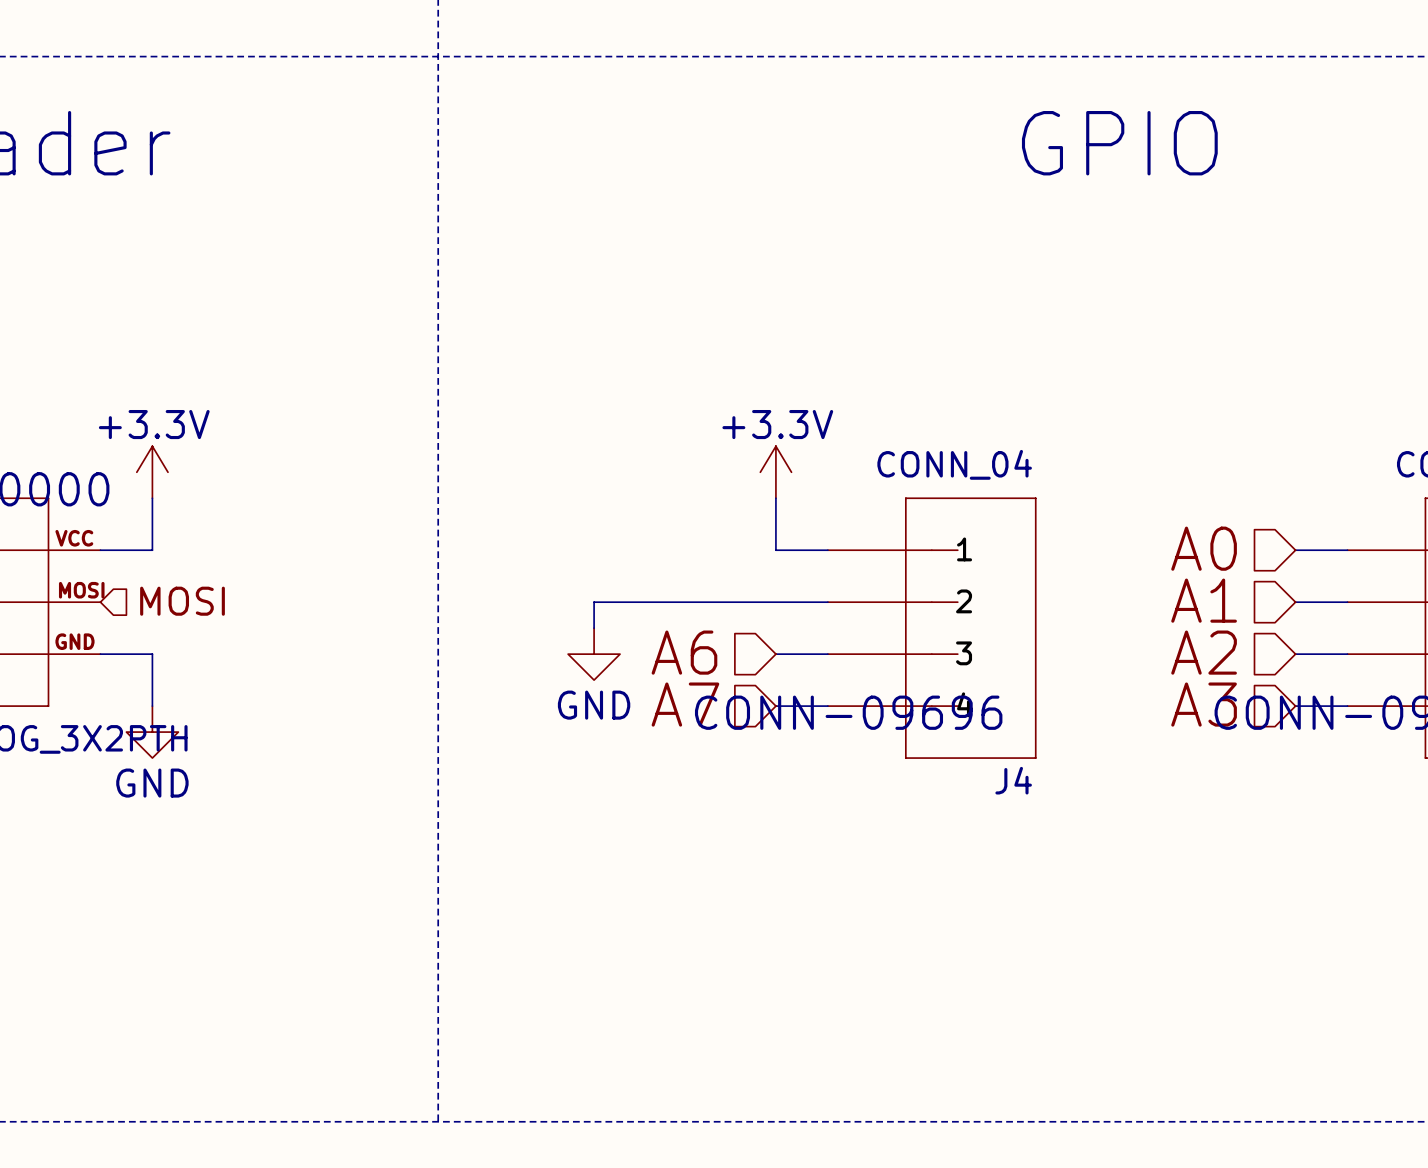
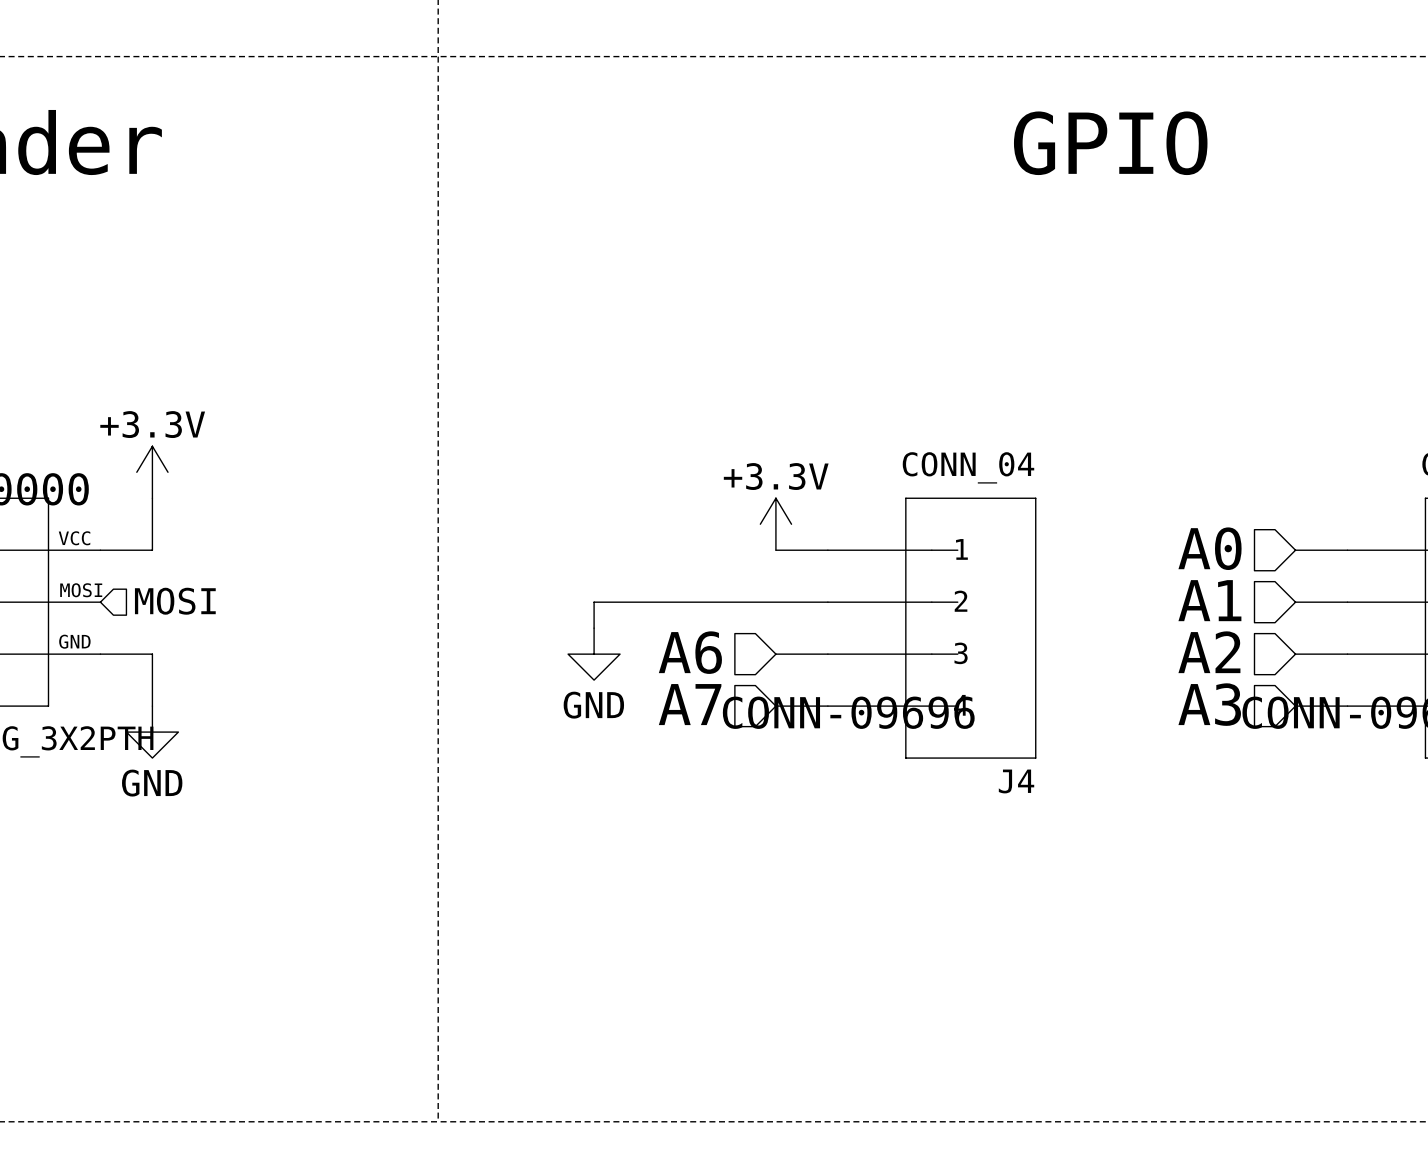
power symbol position: +3.3V (775, 472) -> +3.3V (775, 524)

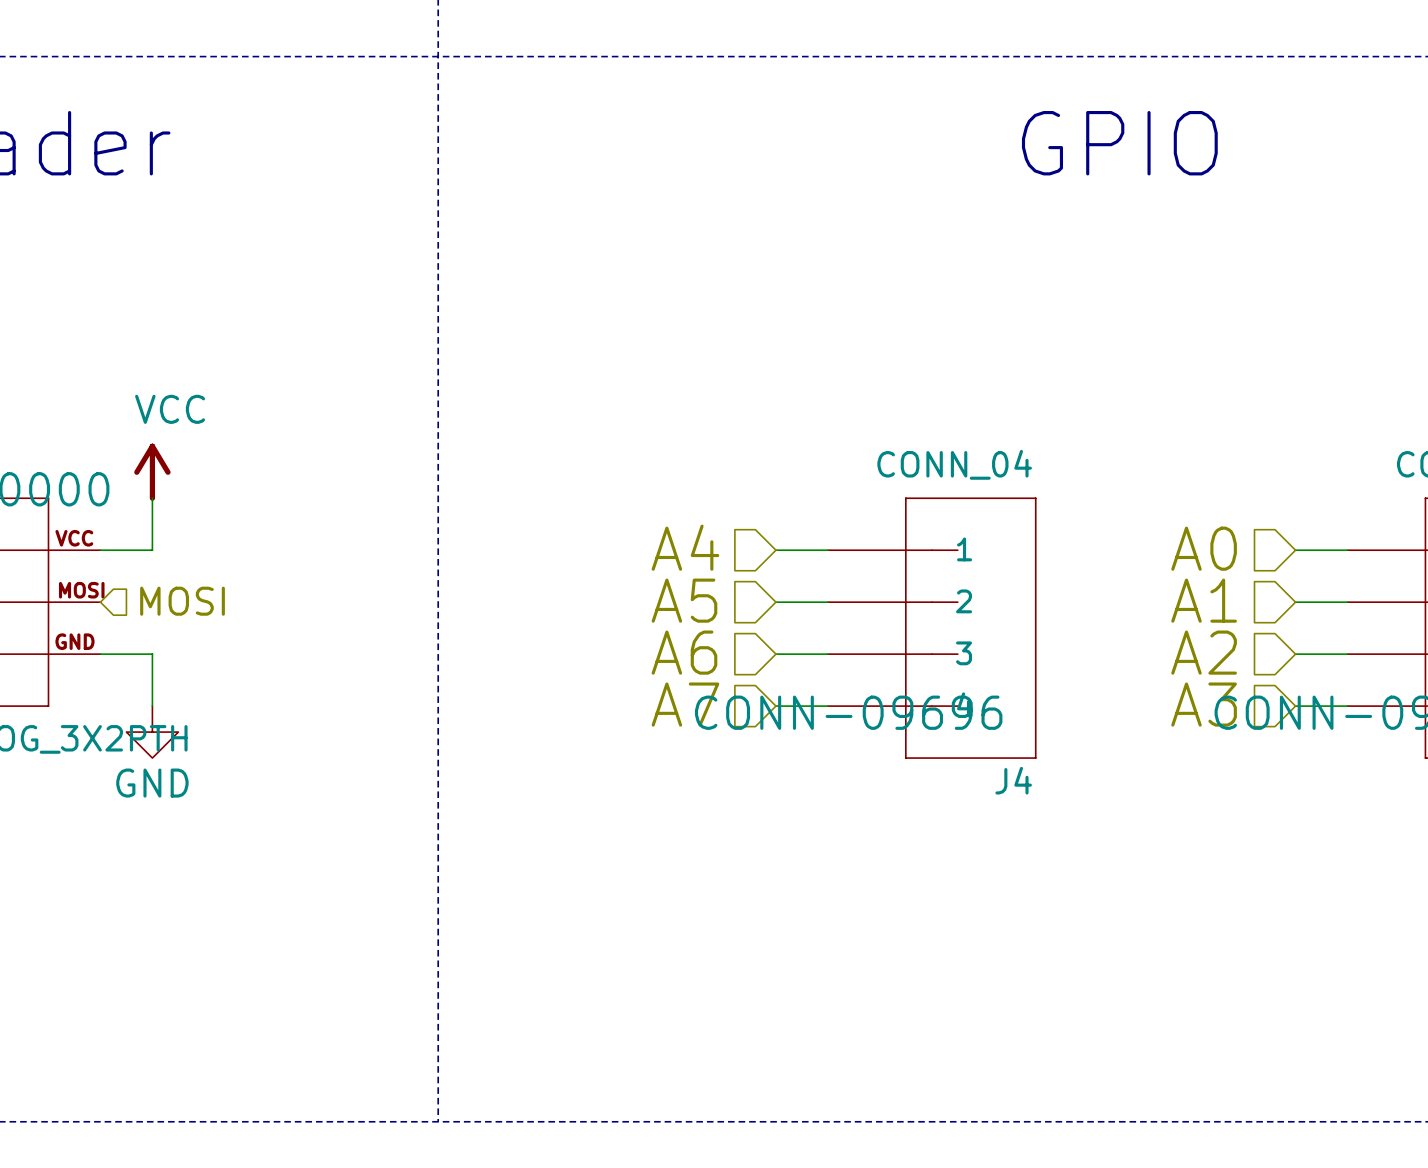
power symbol: +3.3V (152, 472) -> VCC (152, 472)
power symbol: +3.3V (775, 524) -> none
hierarchical label: none -> A4 (685, 547)
hierarchical label: none -> A5 (684, 600)
wire: (775, 602) (594, 602) (594, 628) -> none
power symbol: GND (594, 654) -> none

